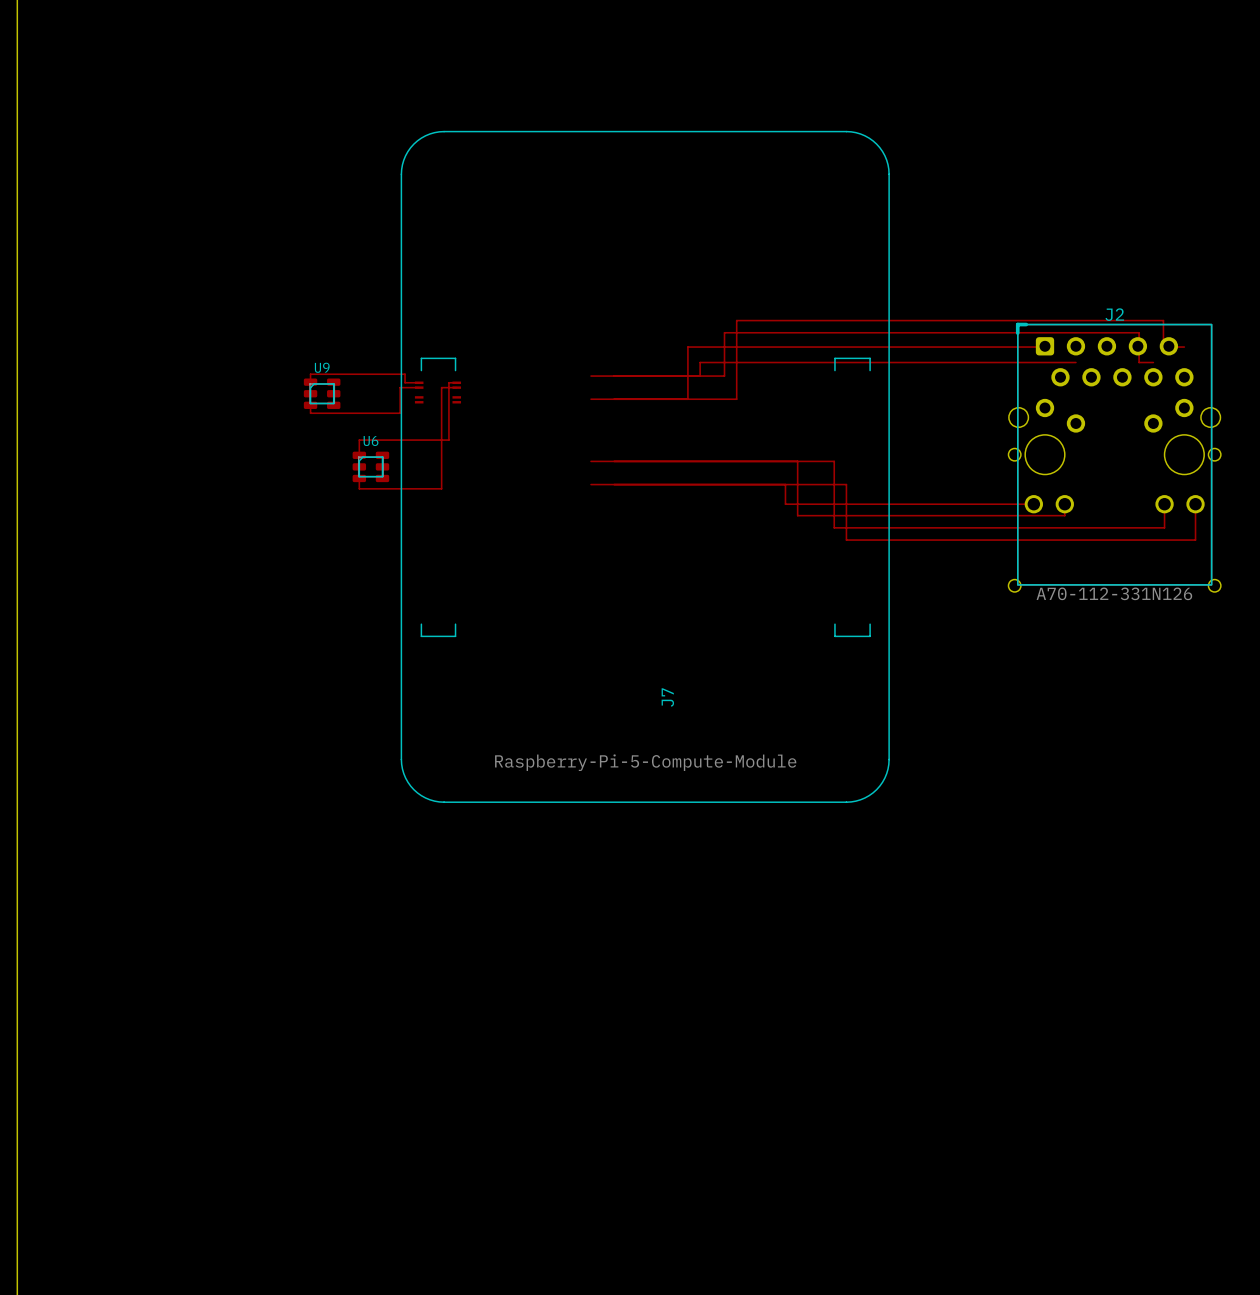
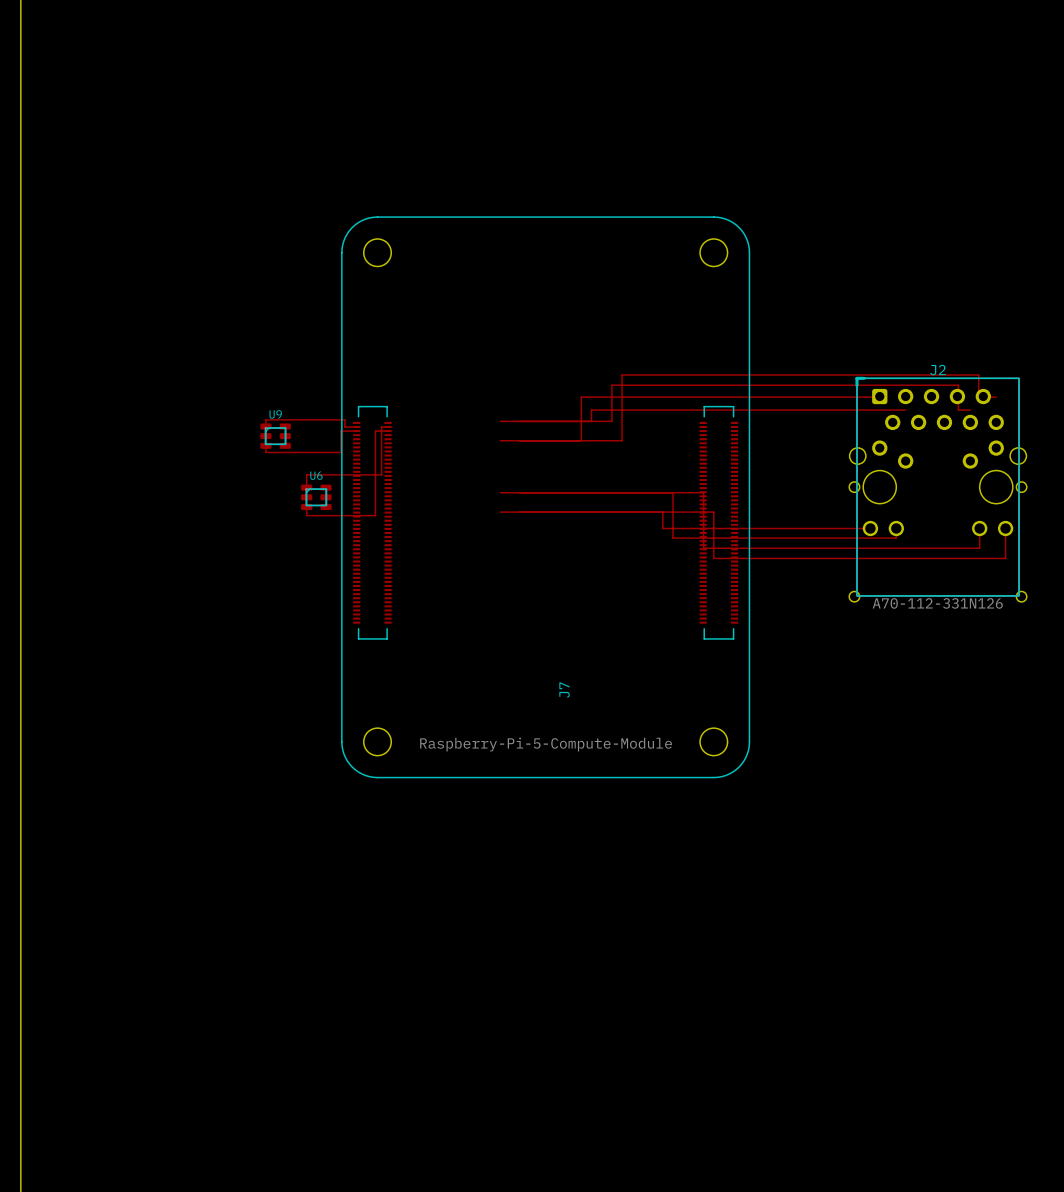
J7 footprint: [400, 130, 890, 803] -> [341, 216, 751, 779]

